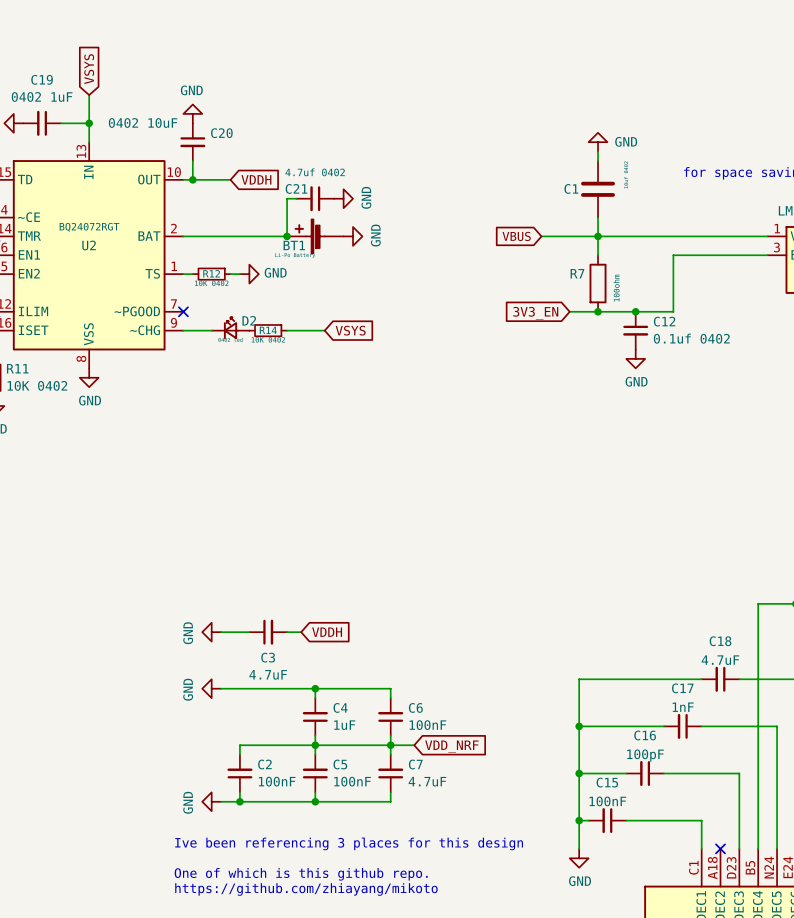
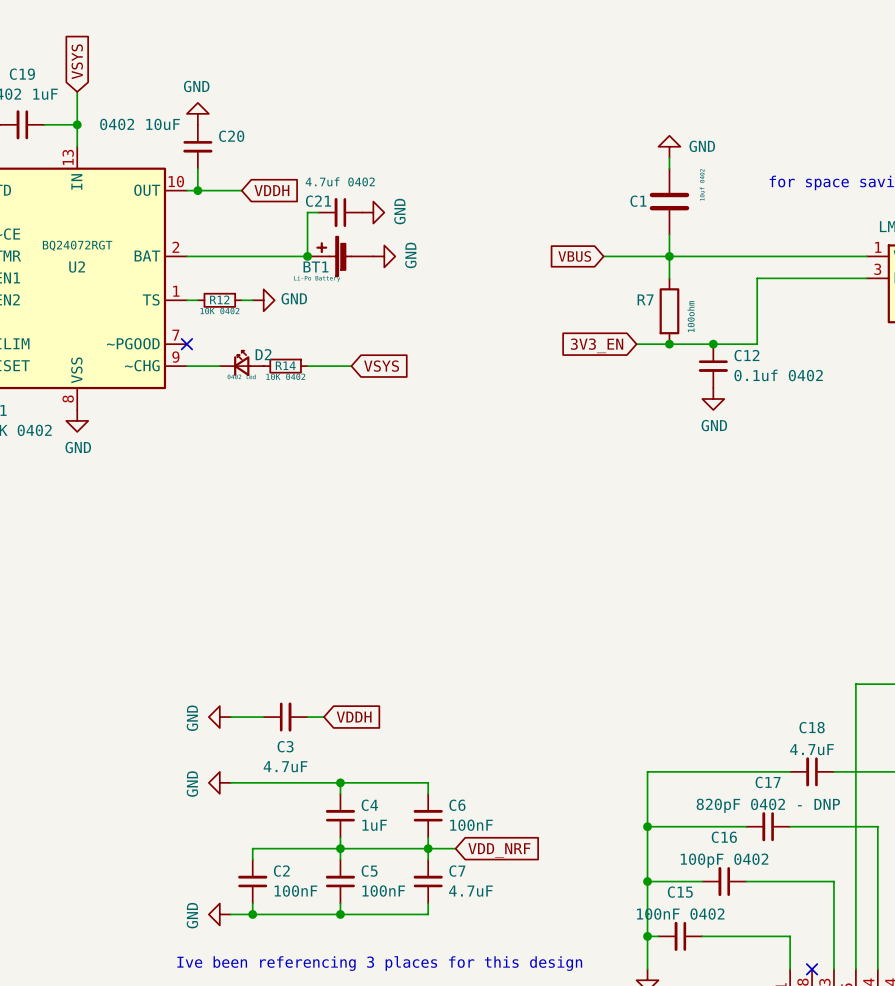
C17 value: 1nF (683, 707) -> 820pF 0402 - DNP (768, 805)
C16 value: 100pF (645, 755) -> 100pF 0402 (724, 860)
C15 value: 100nF (607, 801) -> 100nF 0402 (680, 914)

